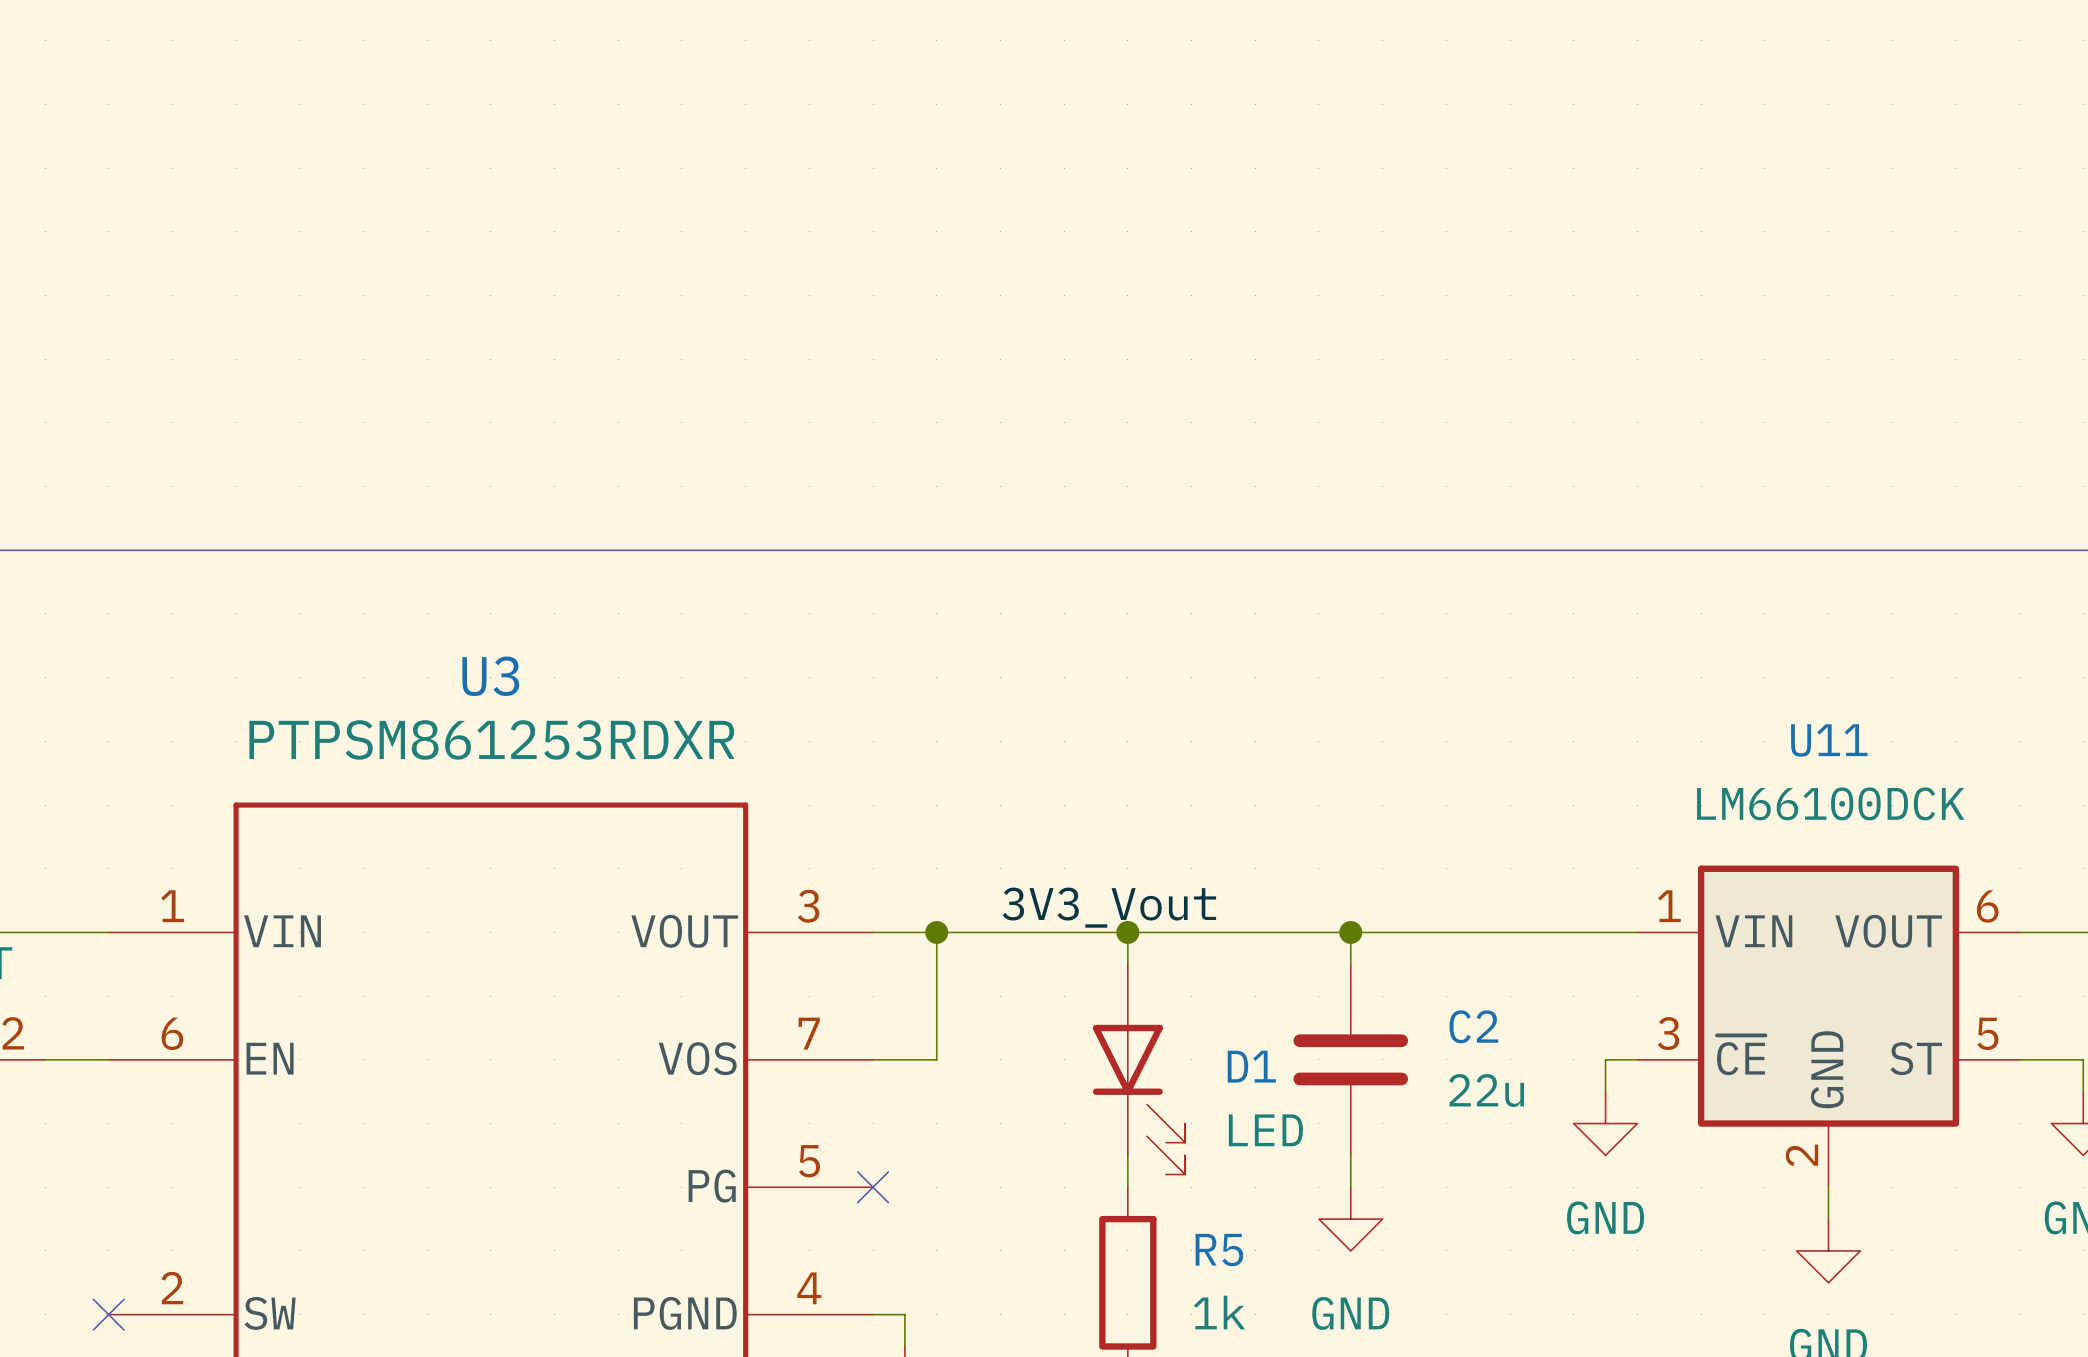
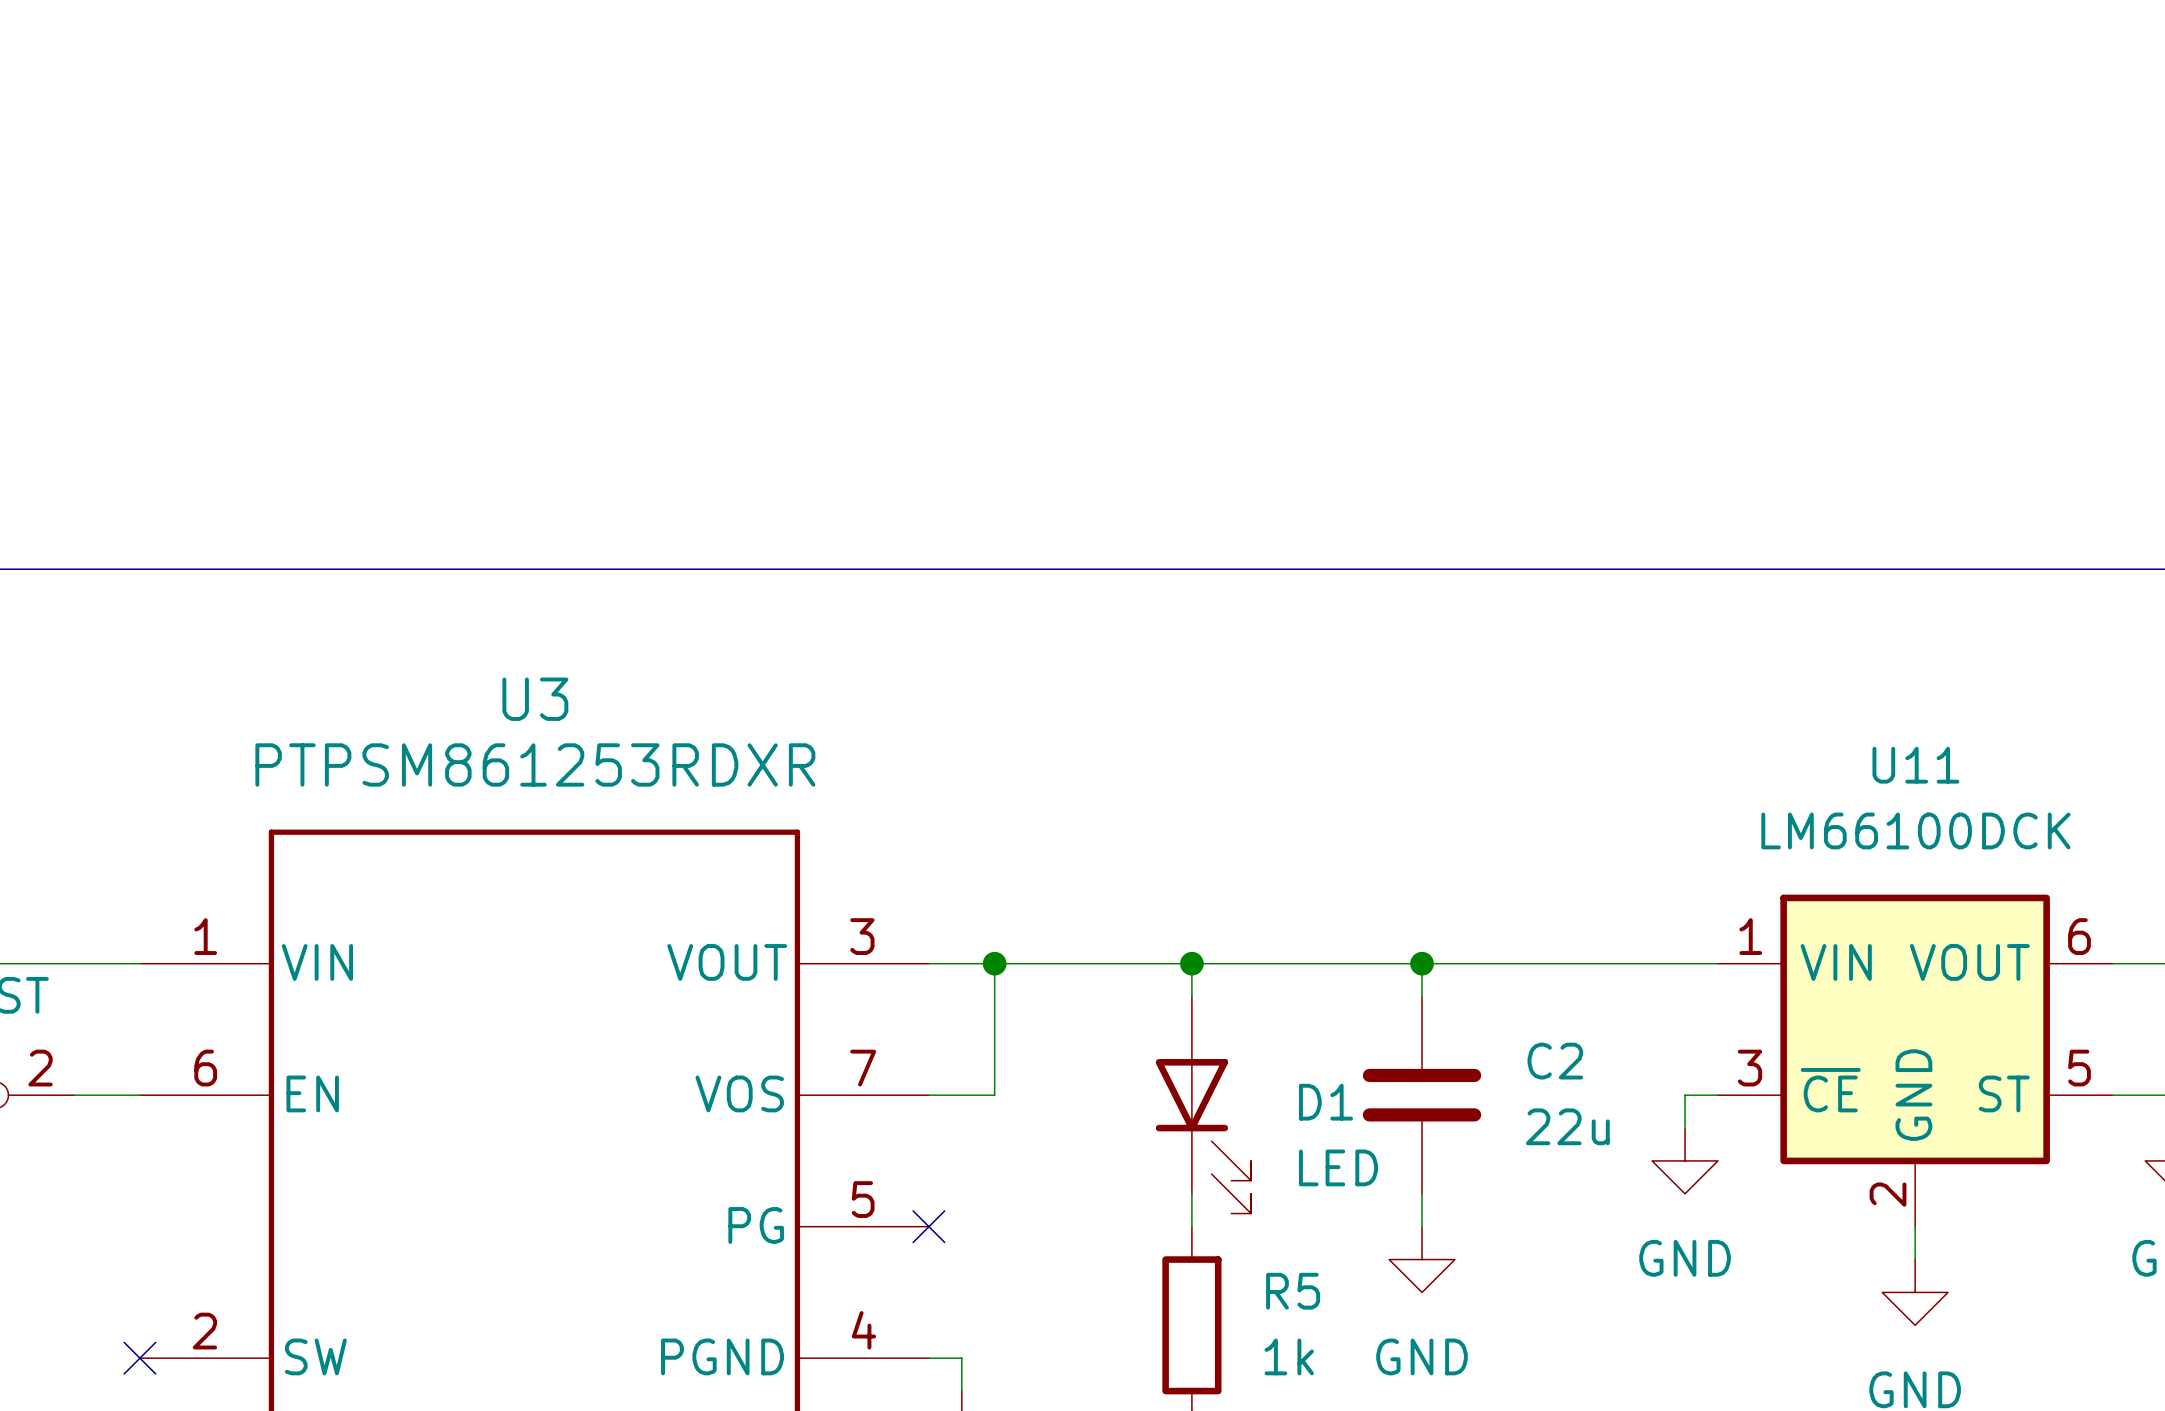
label: 3V3_Vout (1109, 907) -> none

